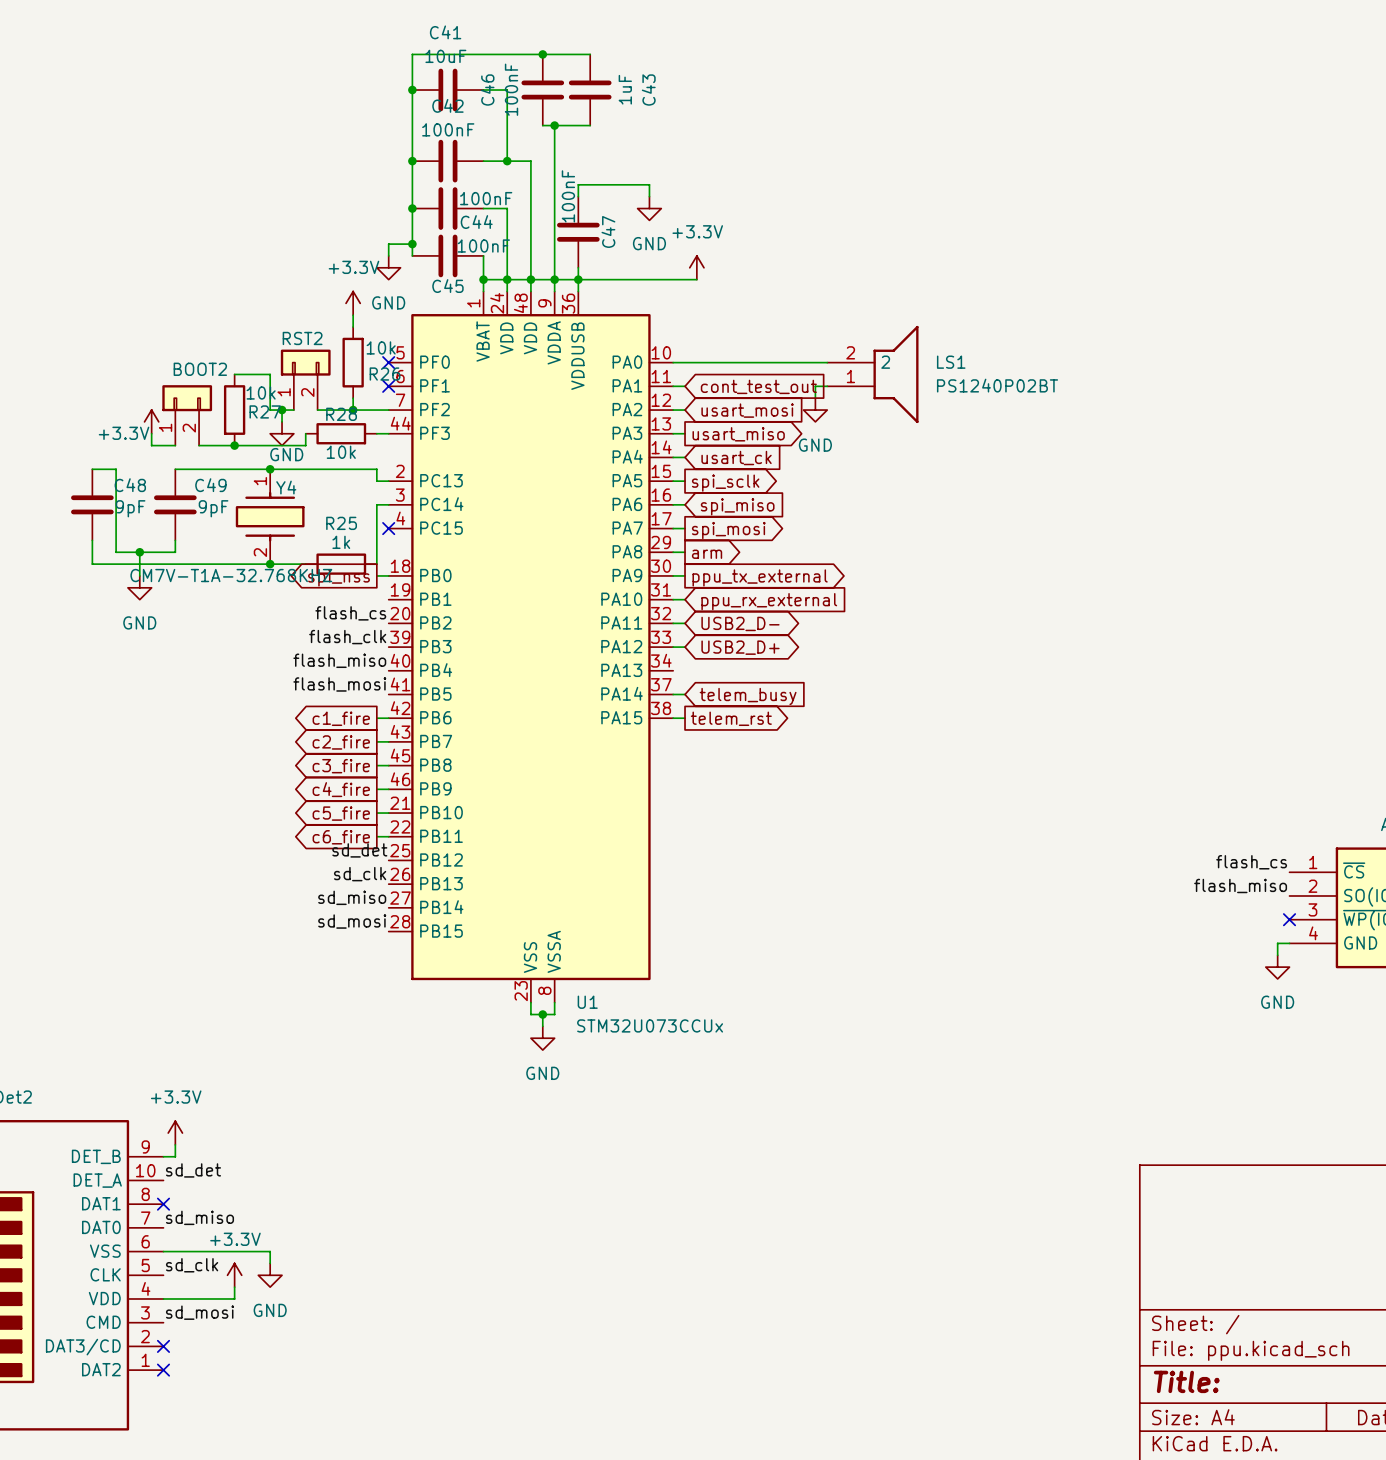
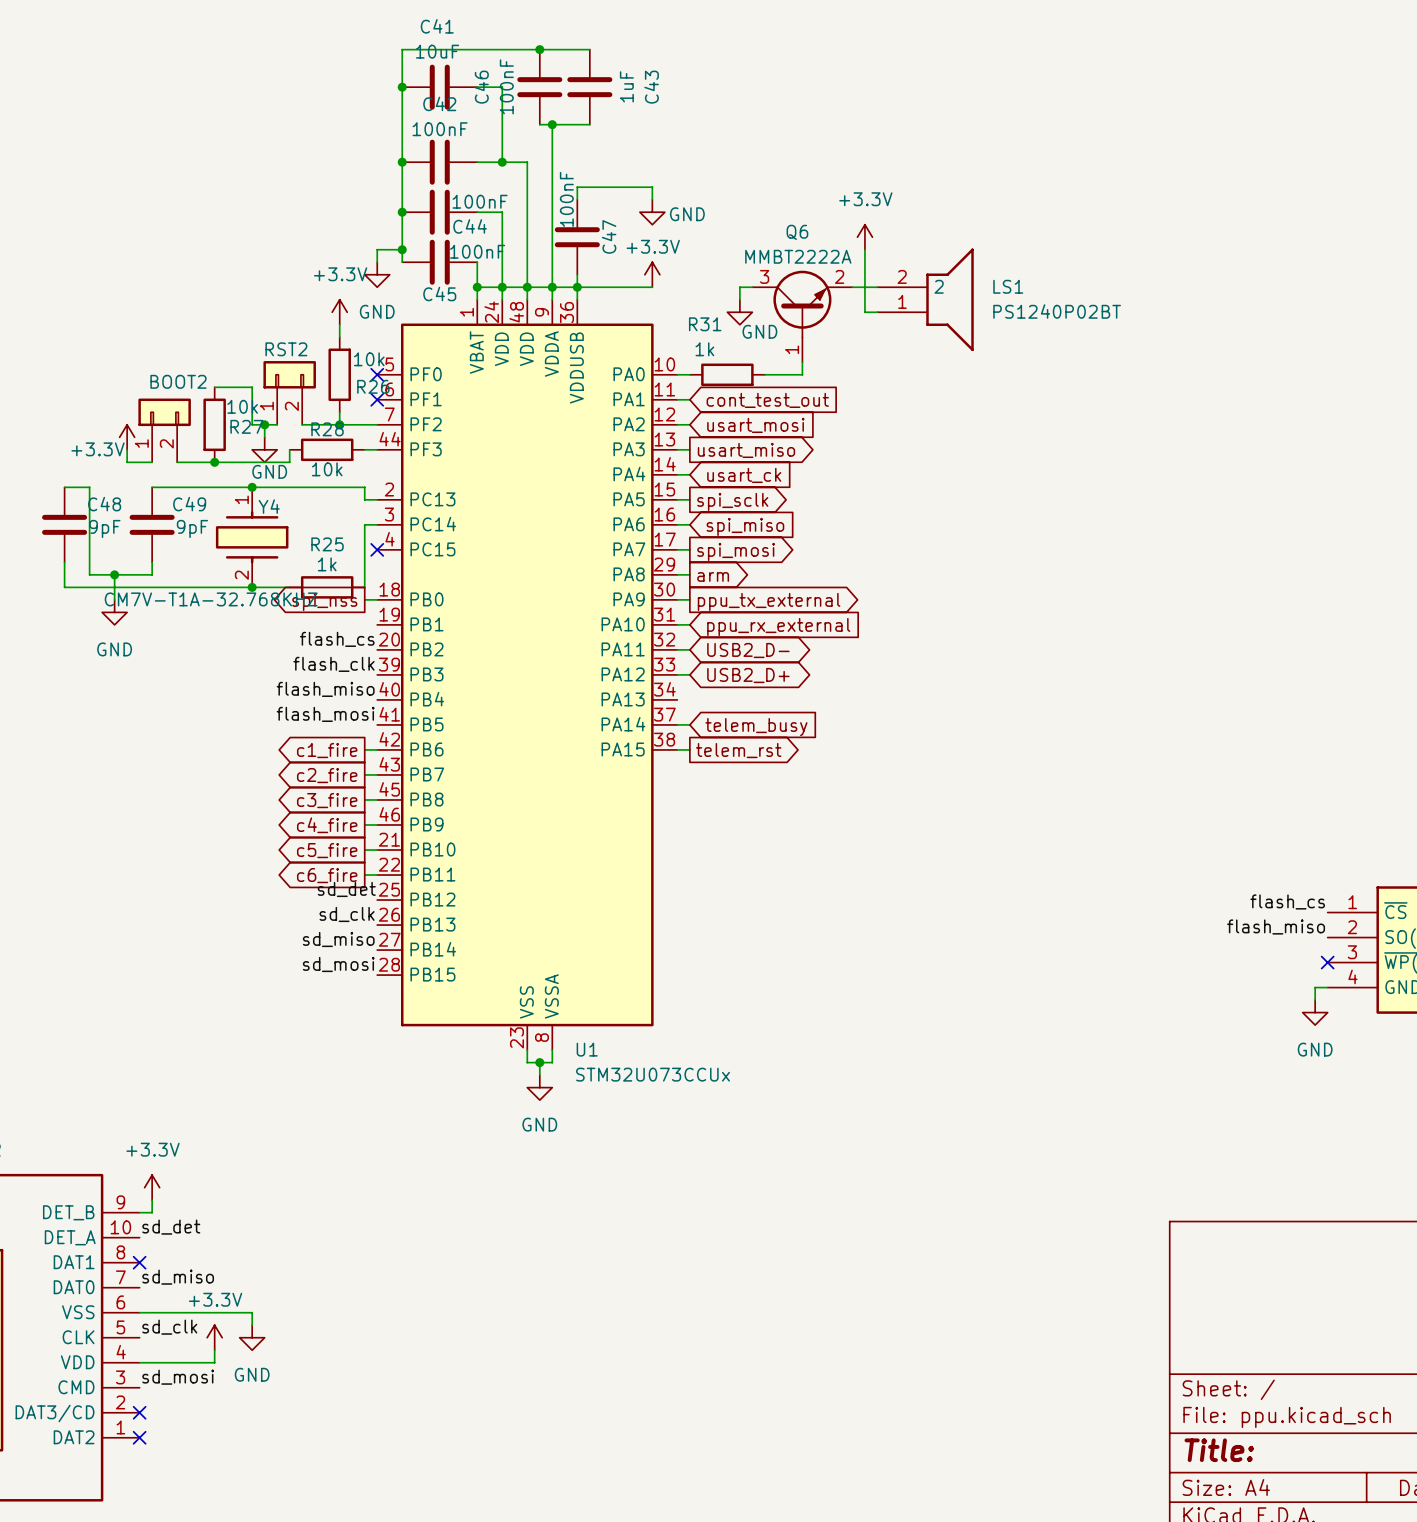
power symbol text position: +3.3V (697, 231) -> +3.3V (653, 246)
power symbol: none -> +3.3V (864, 237)
power symbol text position: GND (649, 243) -> GND (687, 214)
wire: none -> (864, 249) (864, 312) (877, 312)
power symbol position: +3.3V (696, 267) -> +3.3V (652, 274)
wire: (649, 279) (696, 279) -> none
wire: none -> (852, 287) (877, 287)
Q6: none -> MMBT2222A (802, 316)
wire: (685, 362) (756, 362) -> none
R31: none -> 1k (727, 374)
wire: (791, 362) (827, 362) -> (802, 374) (802, 362)
LS1 position: (872, 374) -> (925, 299)
wire: (827, 386) (815, 386) (815, 398) -> (752, 287) (739, 287) (739, 299)
power symbol position: GND (815, 410) -> GND (739, 312)
power symbol text position: GND (815, 445) -> GND (759, 331)

